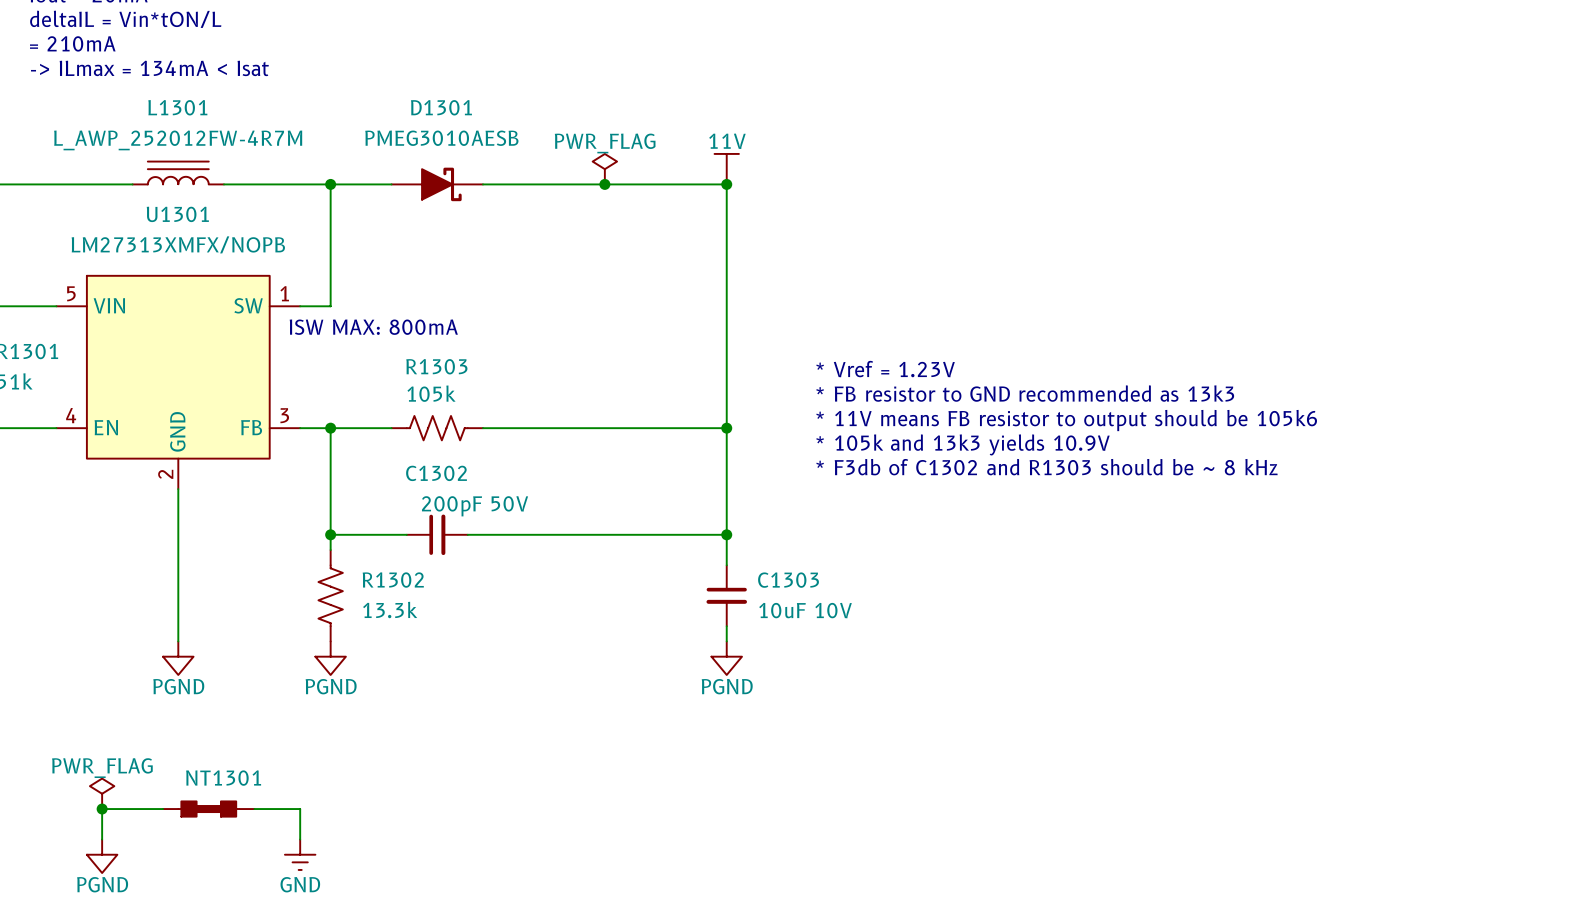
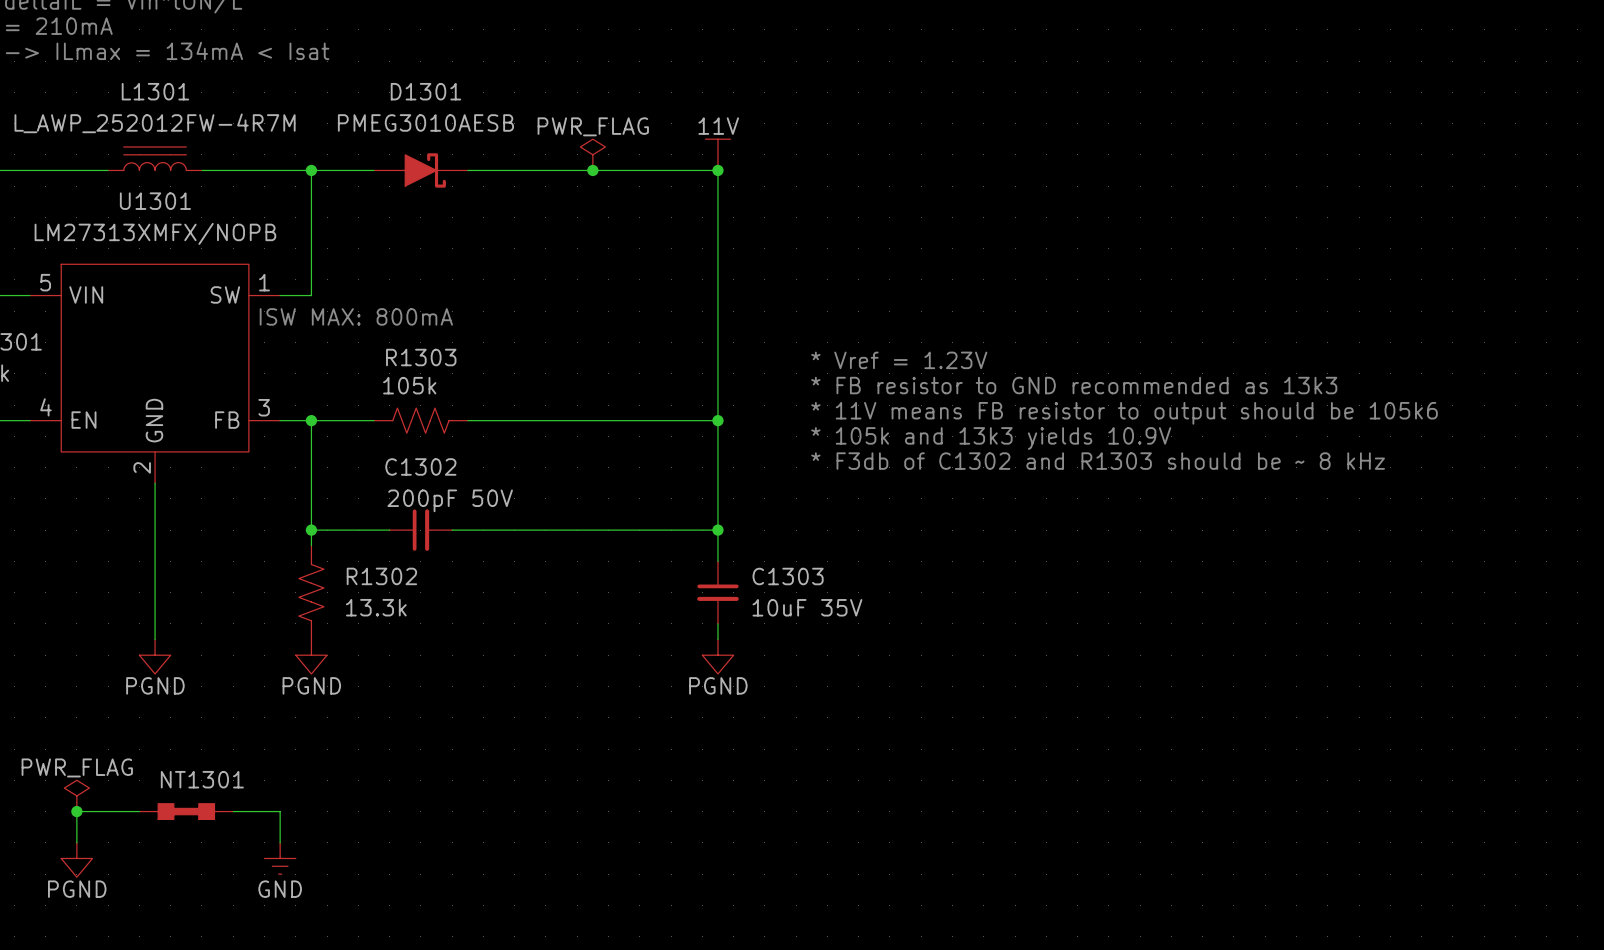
C1303 value: 10uF 10V (805, 610) -> 10uF 35V (807, 607)

